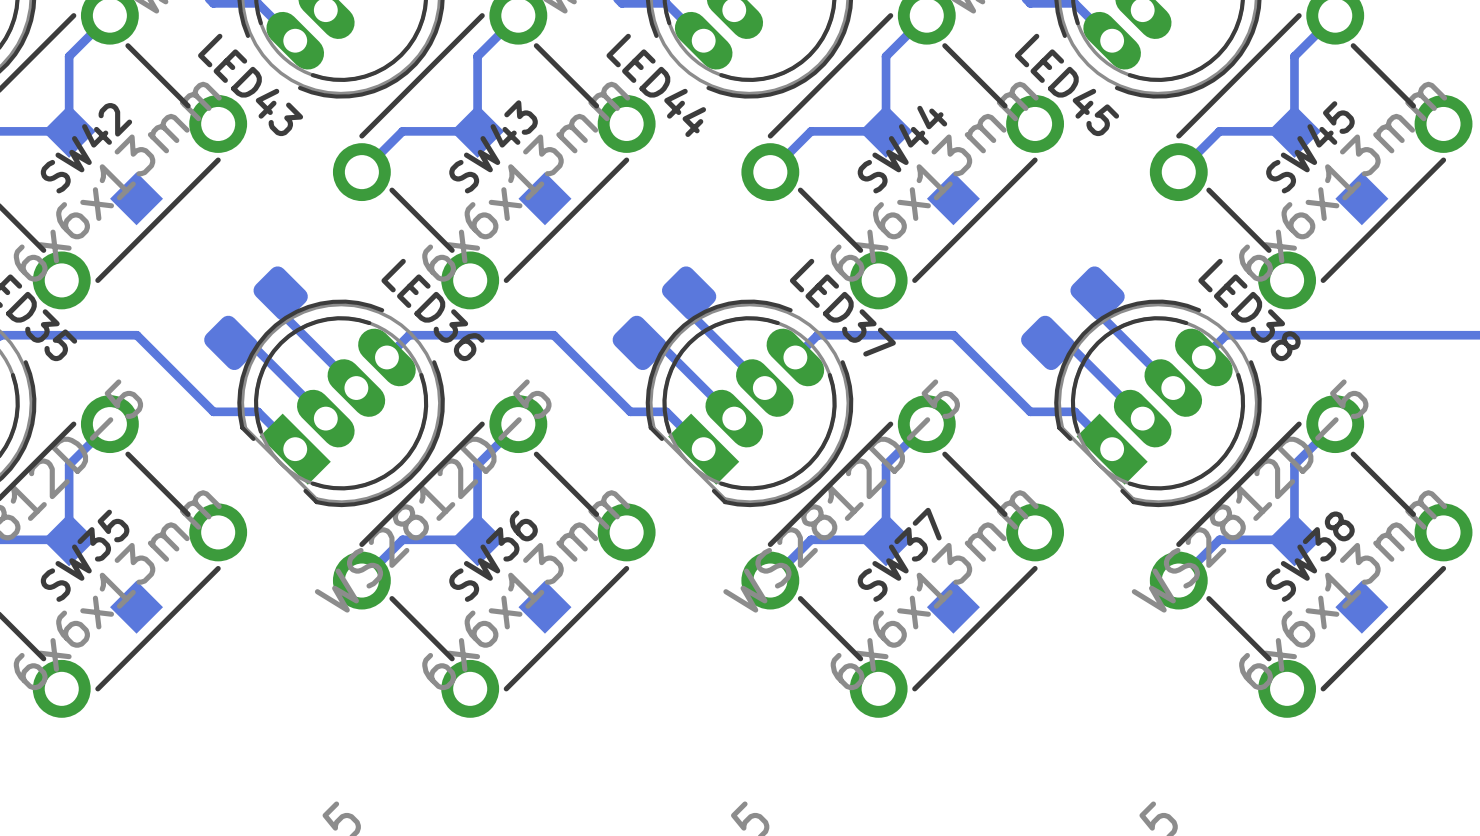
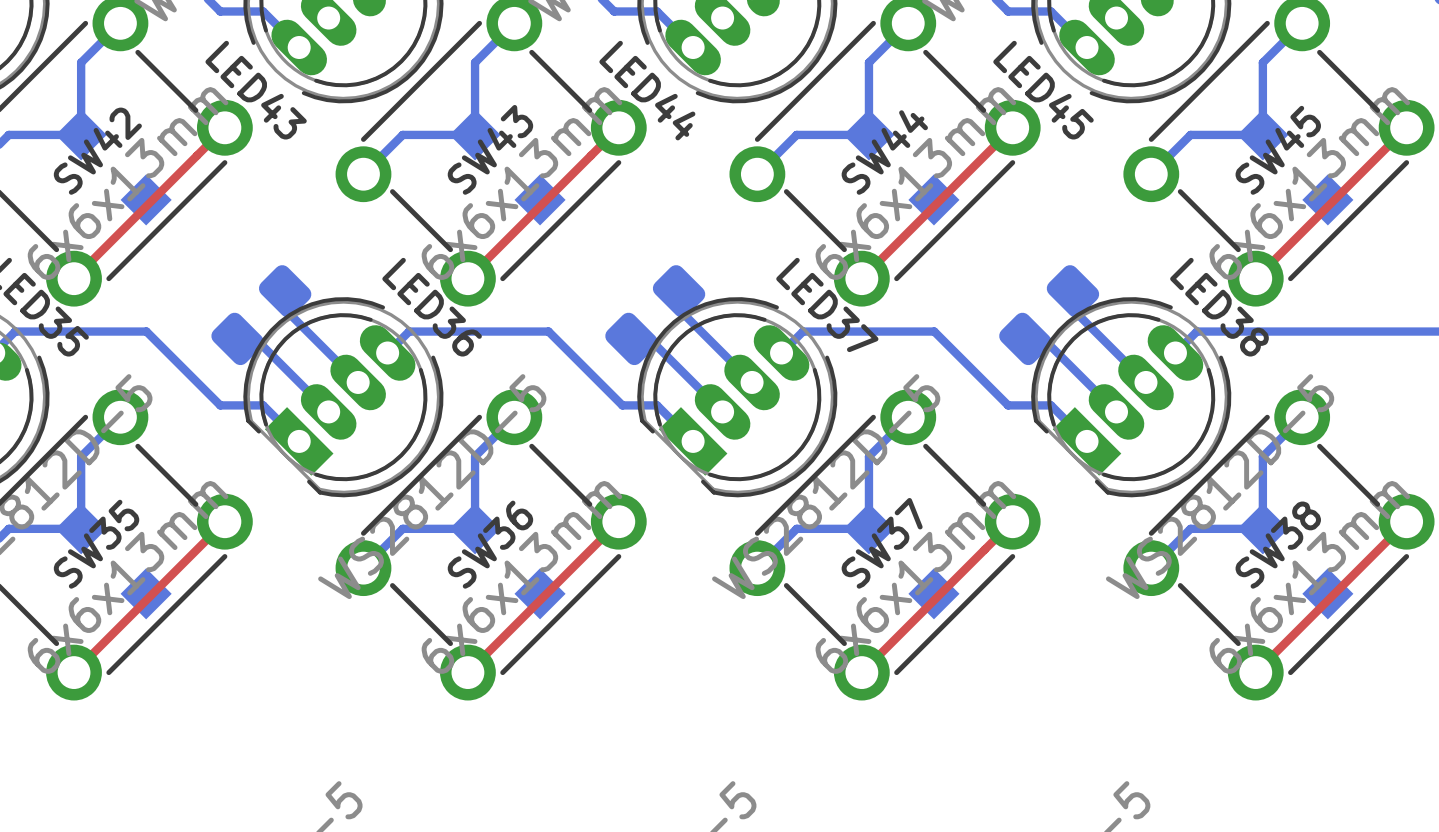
top track: none -> (224, 127) (74, 278)
top track: none -> (618, 127) (467, 278)
top track: none -> (1012, 127) (861, 278)
top track: none -> (1406, 127) (1255, 278)
top track: none -> (224, 521) (74, 672)
top track: none -> (618, 521) (467, 672)
top track: none -> (1012, 521) (861, 672)
top track: none -> (1406, 521) (1255, 672)

